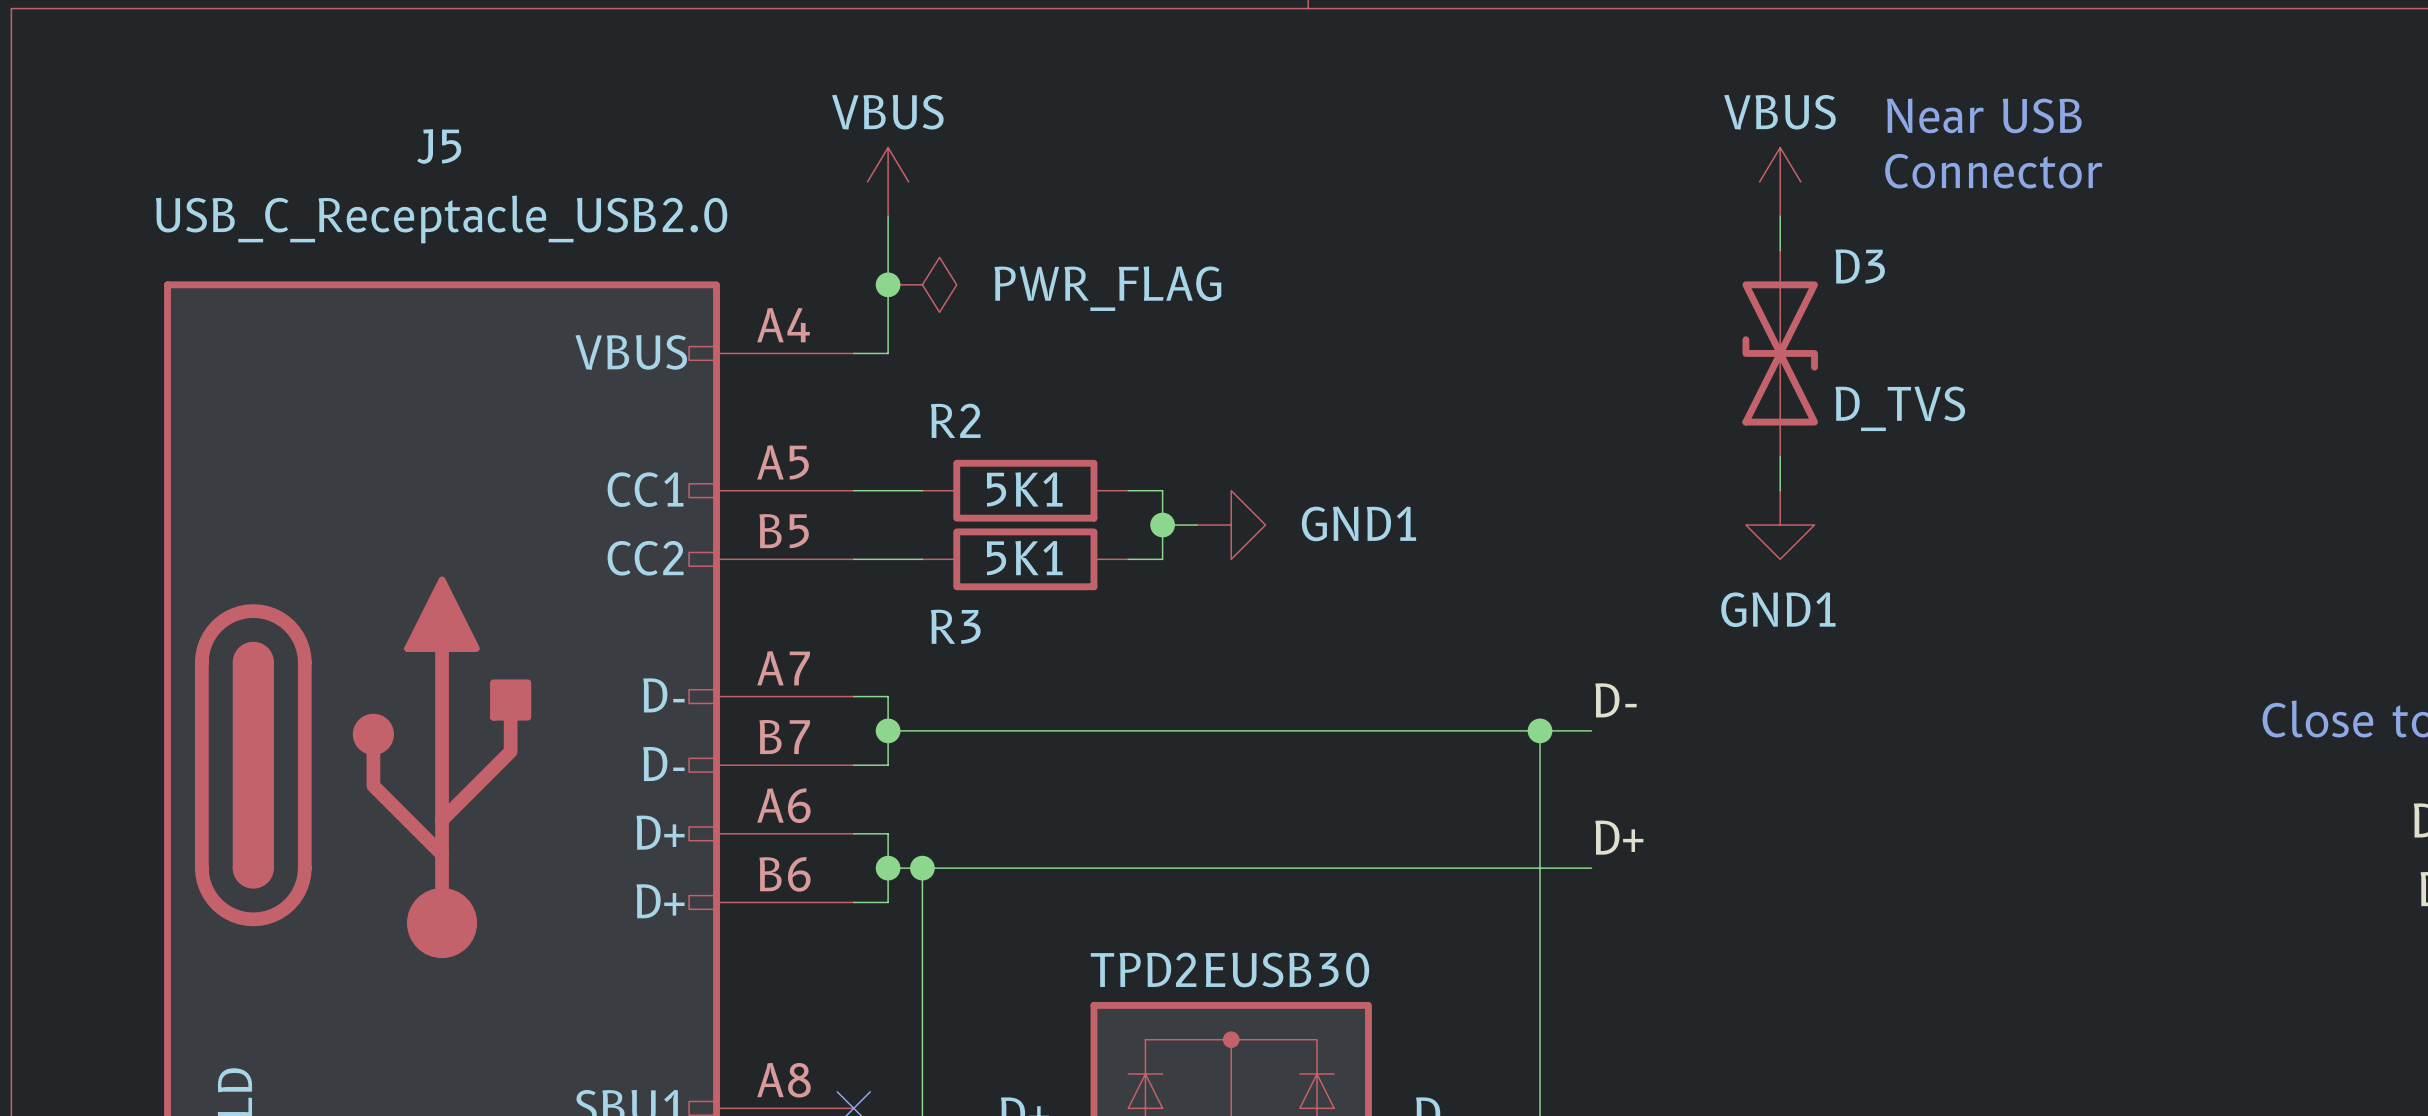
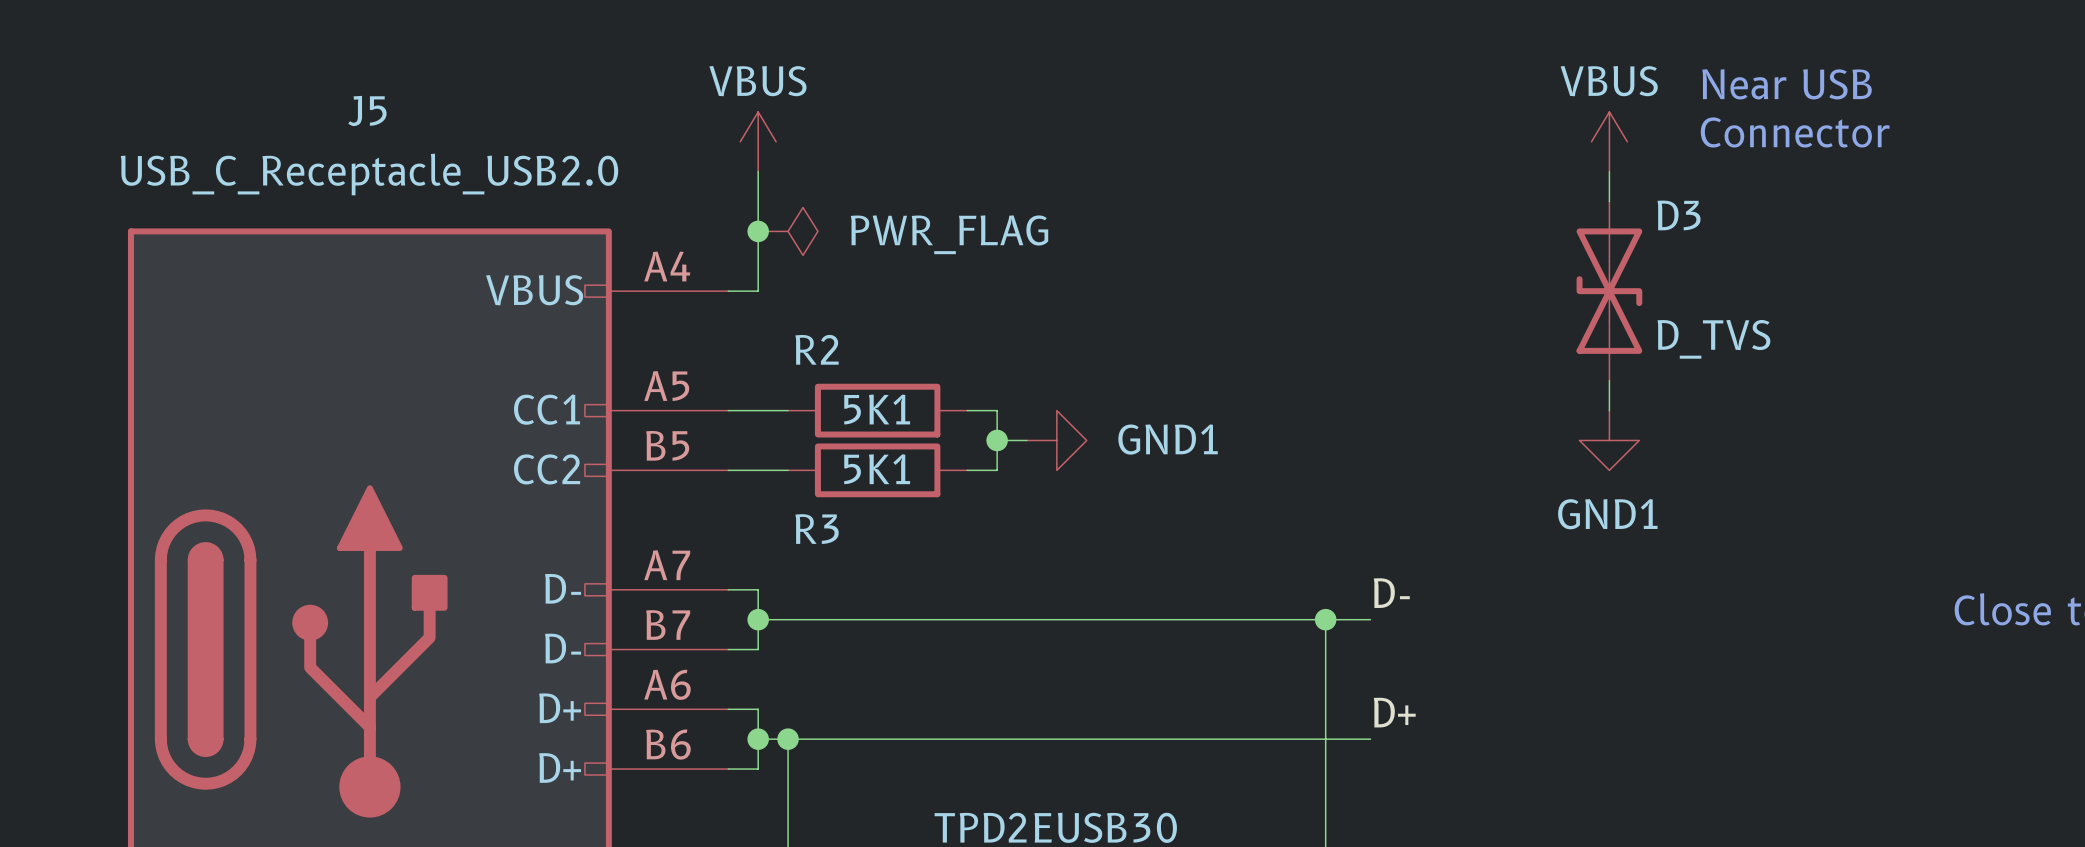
text position: Near USB (1984, 115) -> Near USB (1787, 84)
text position: Connector (1993, 171) -> Connector (1795, 132)
power symbol position: VBUS (1780, 181) -> VBUS (1609, 141)
wire: (1780, 216) (1780, 250) -> (1609, 171) (1609, 201)
D3 position: (1780, 353) -> (1609, 291)
wire: (1780, 456) (1780, 490) -> (1609, 380) (1609, 410)
power symbol position: GND1 (1780, 525) -> GND1 (1609, 440)

